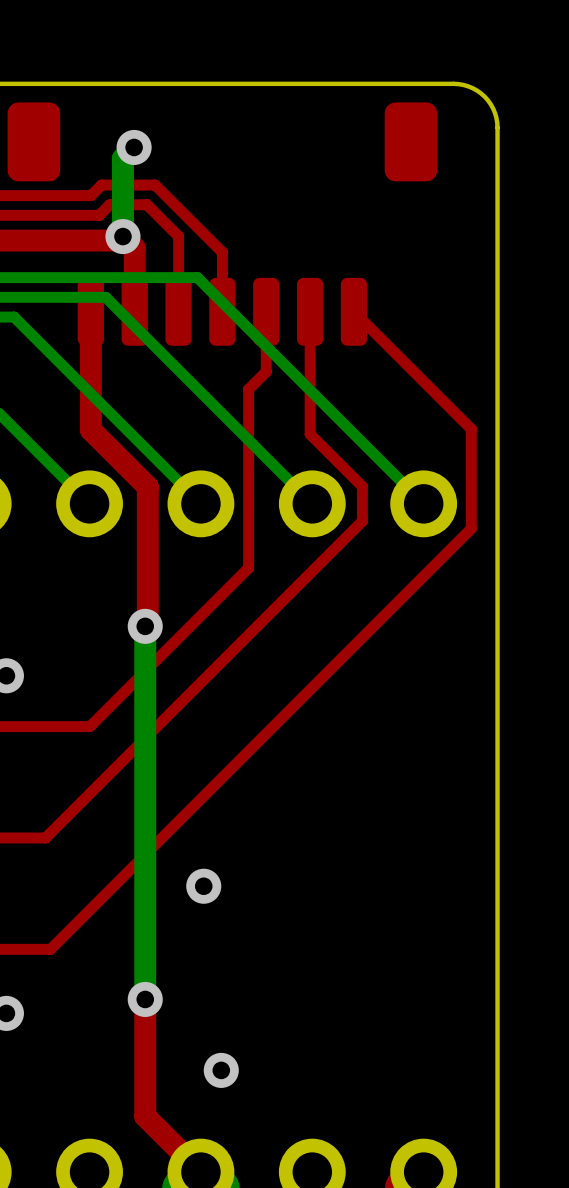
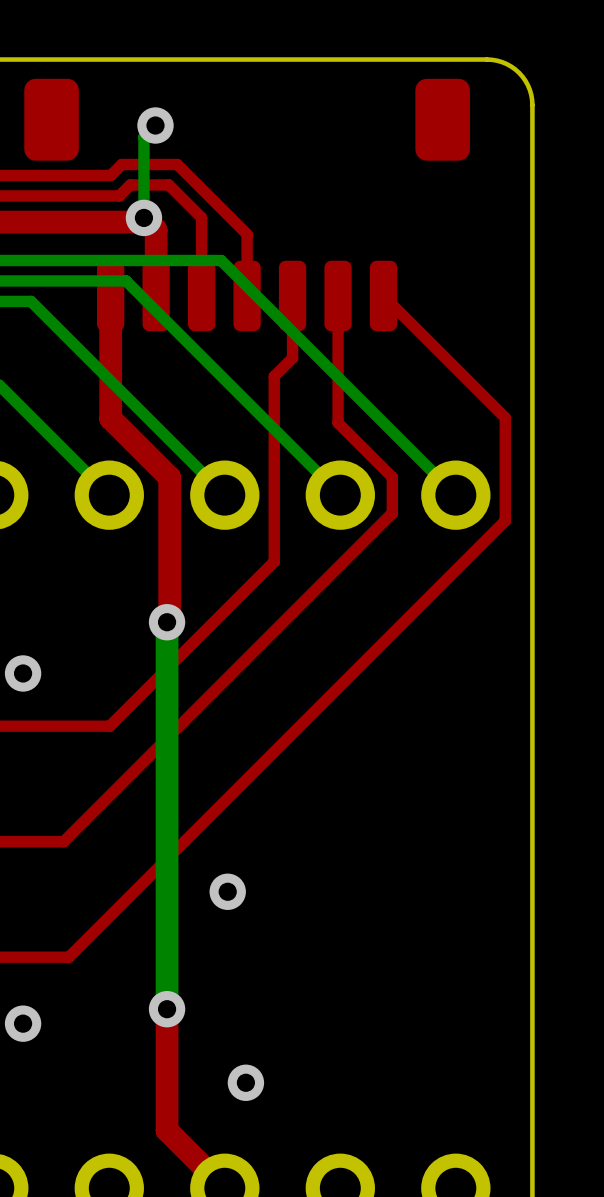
bottom track width: thick (134, 147) (122, 158) (122, 236) -> thin (155, 125) (143, 137) (143, 217)

